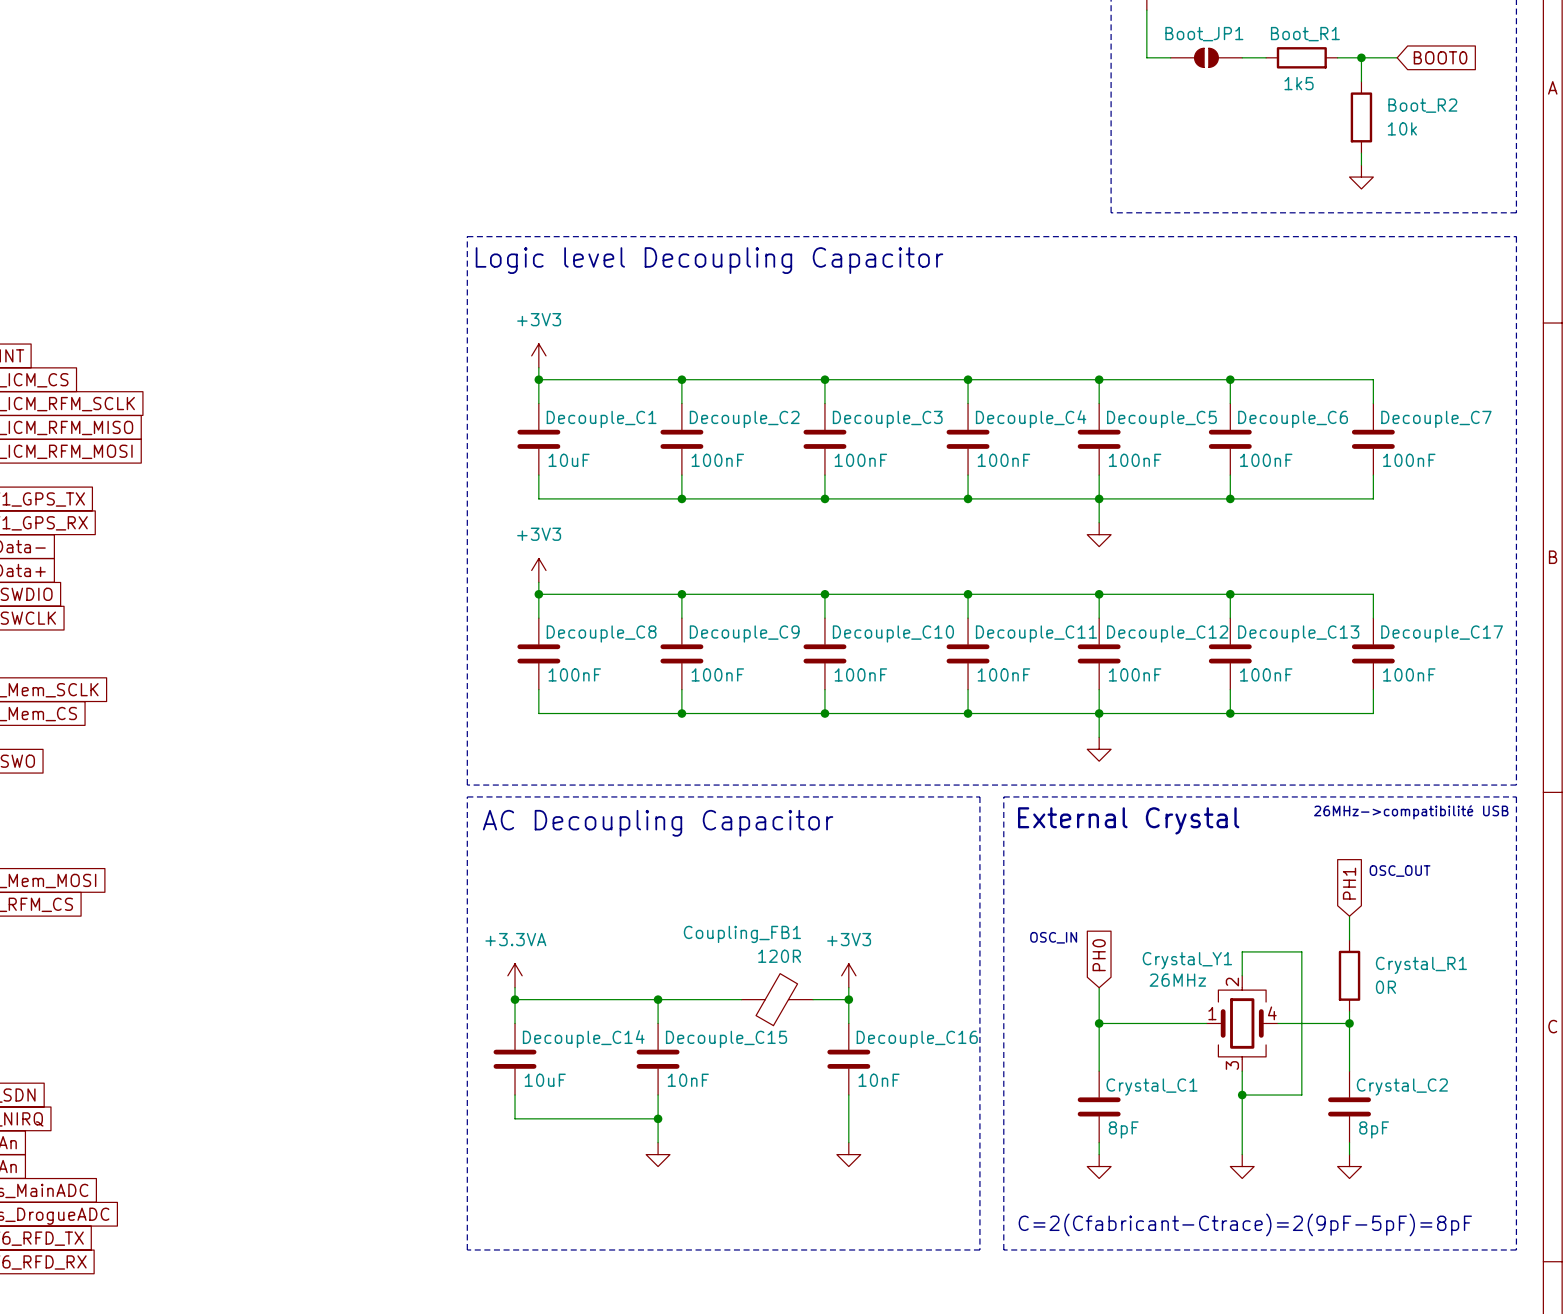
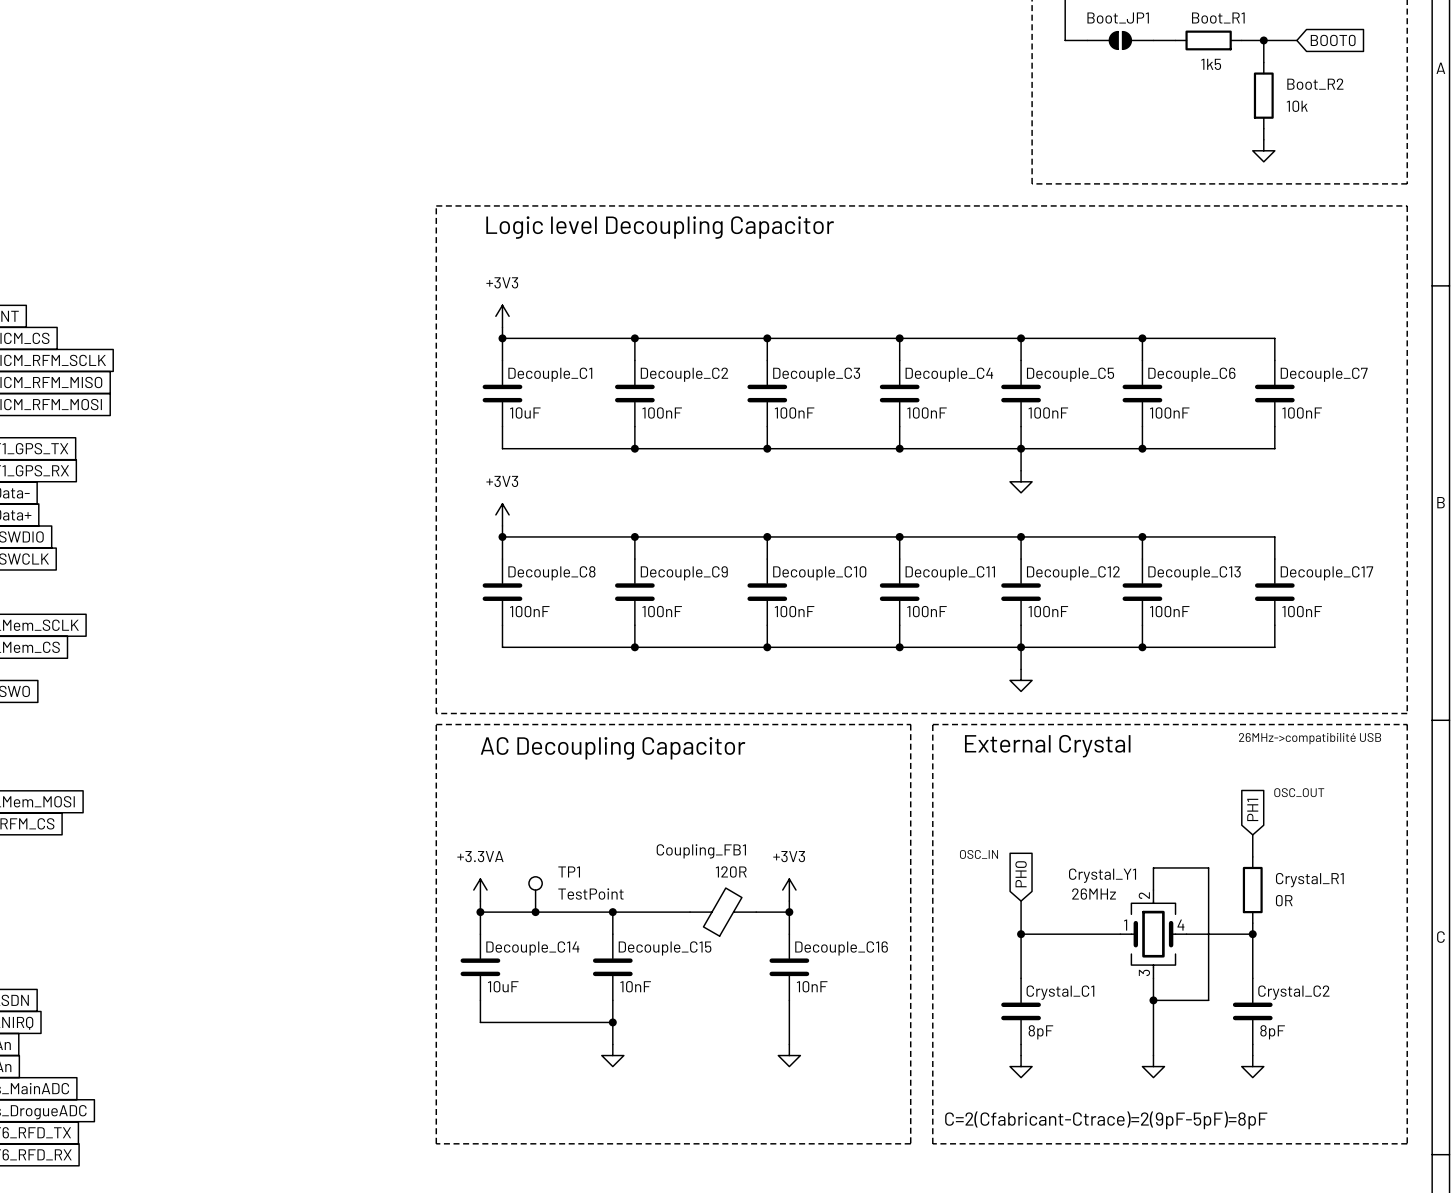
TP1: none -> TestPoint (535, 894)
junction: none -> (535, 912)

